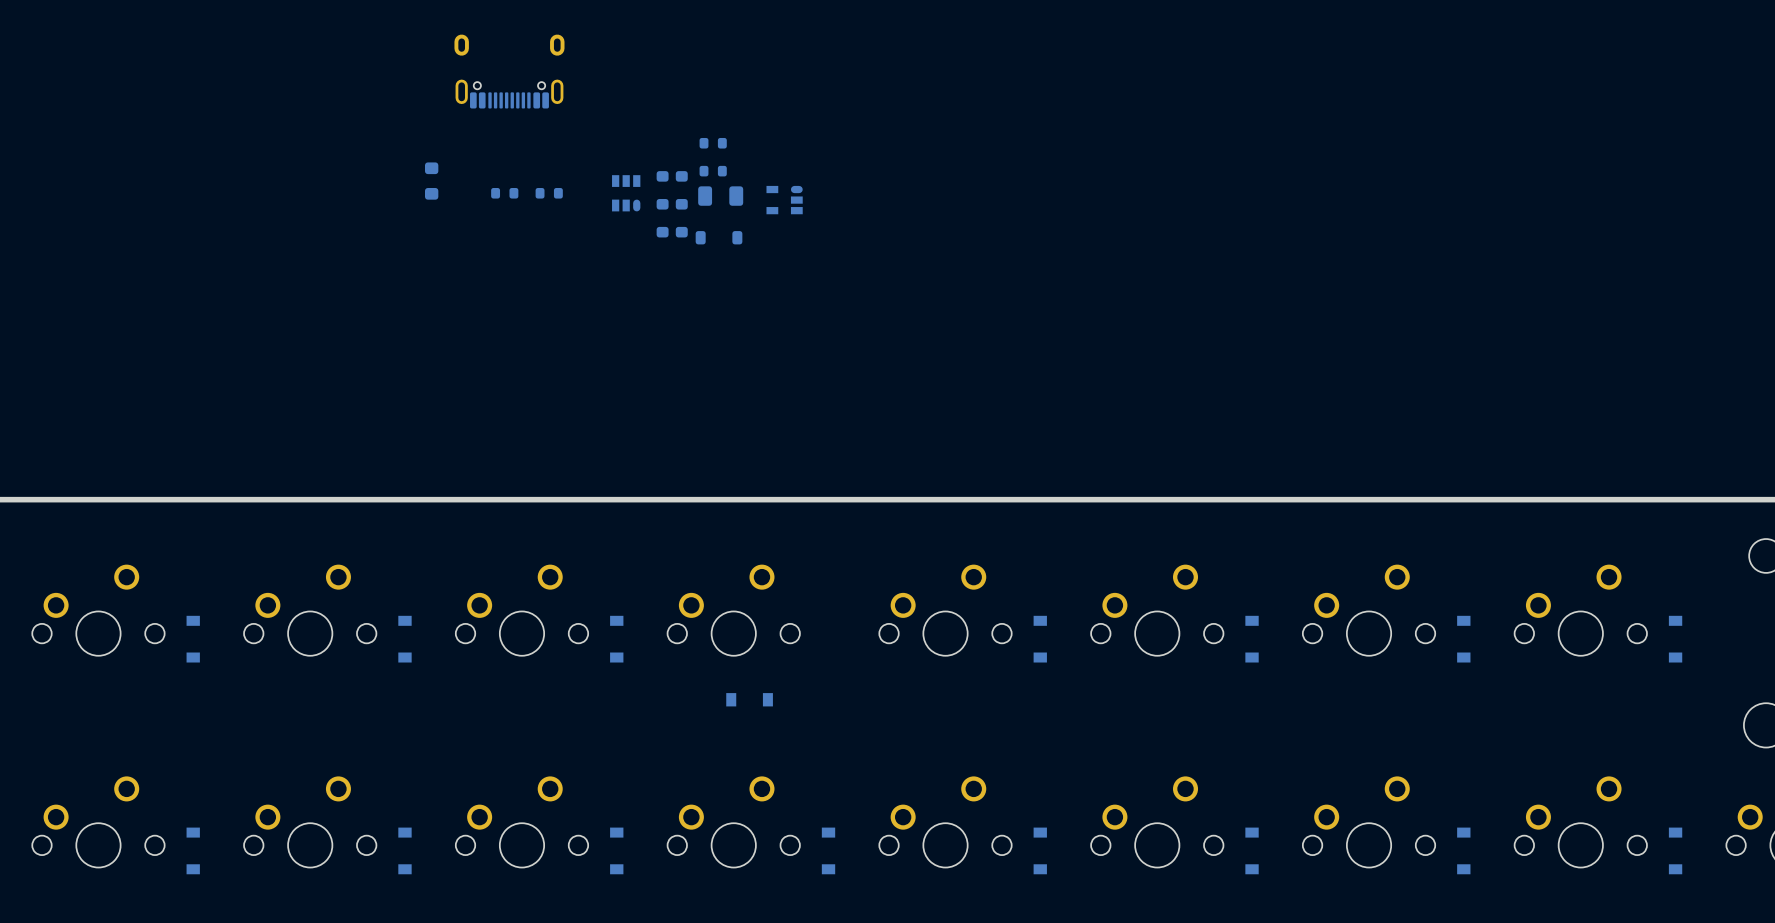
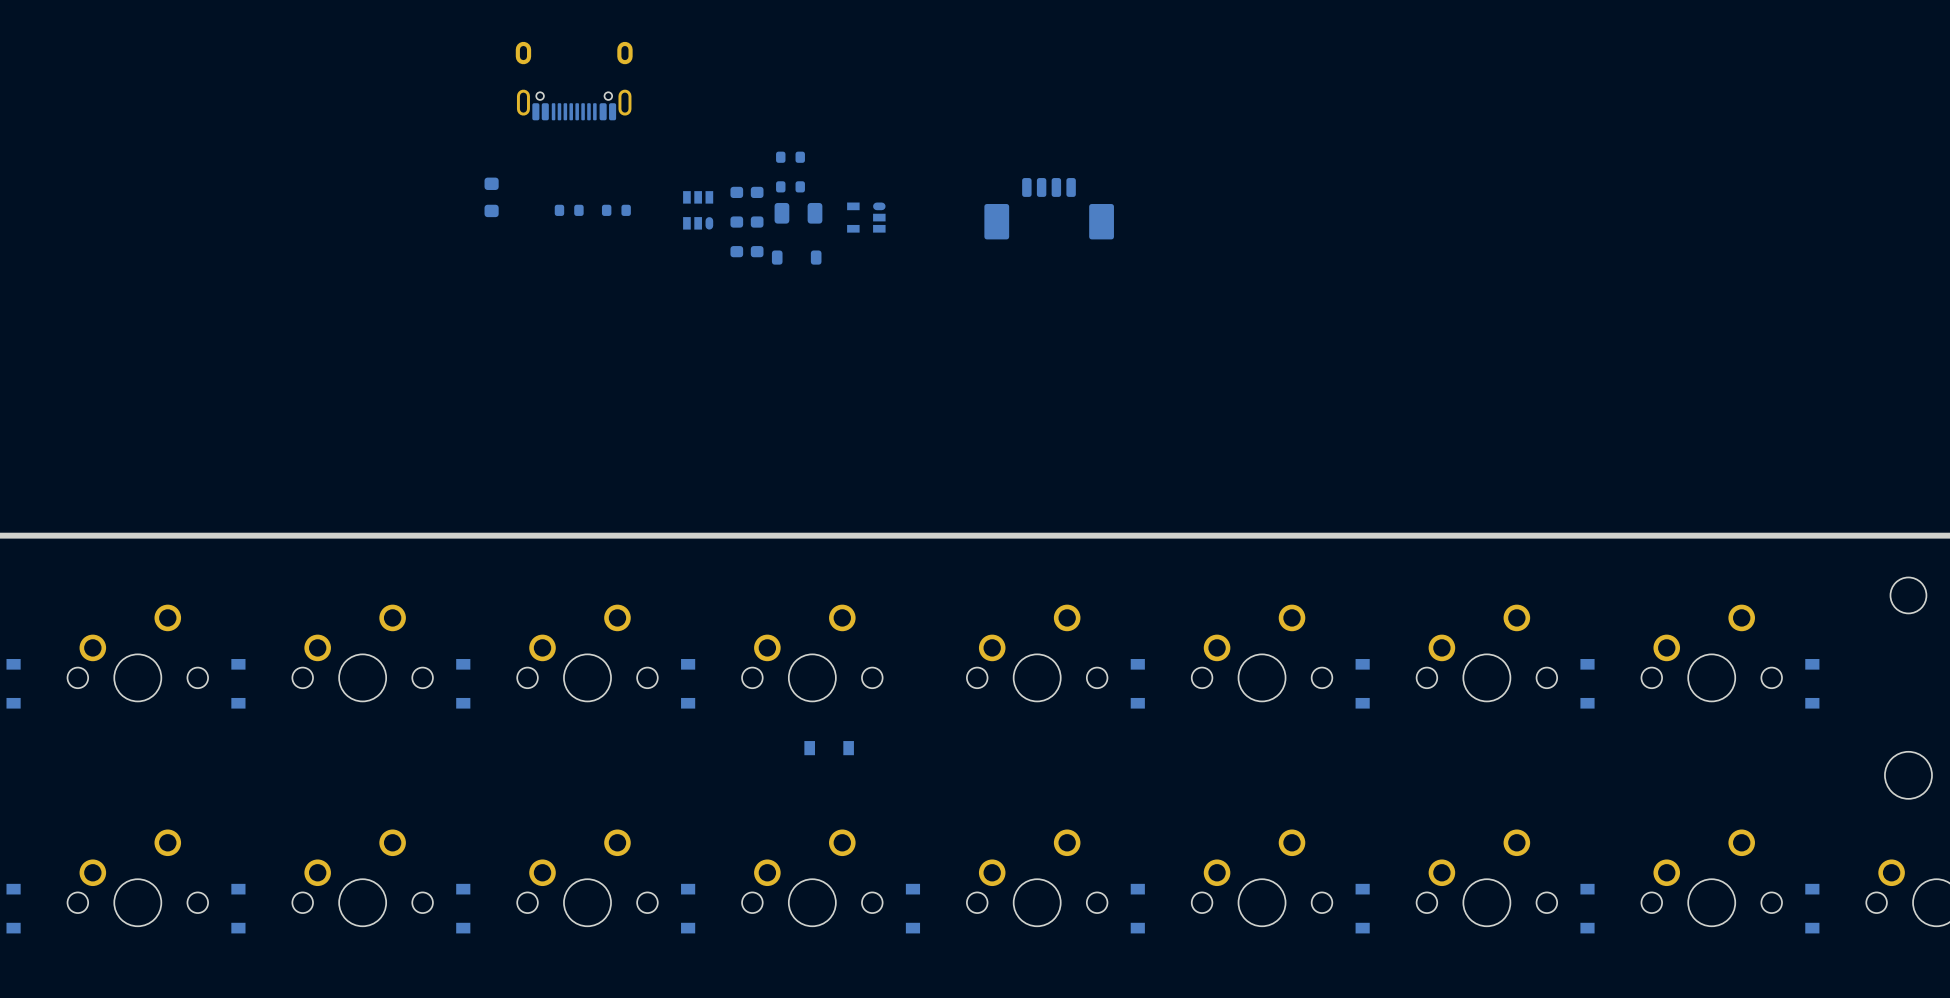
part: none -> (1049, 208)

